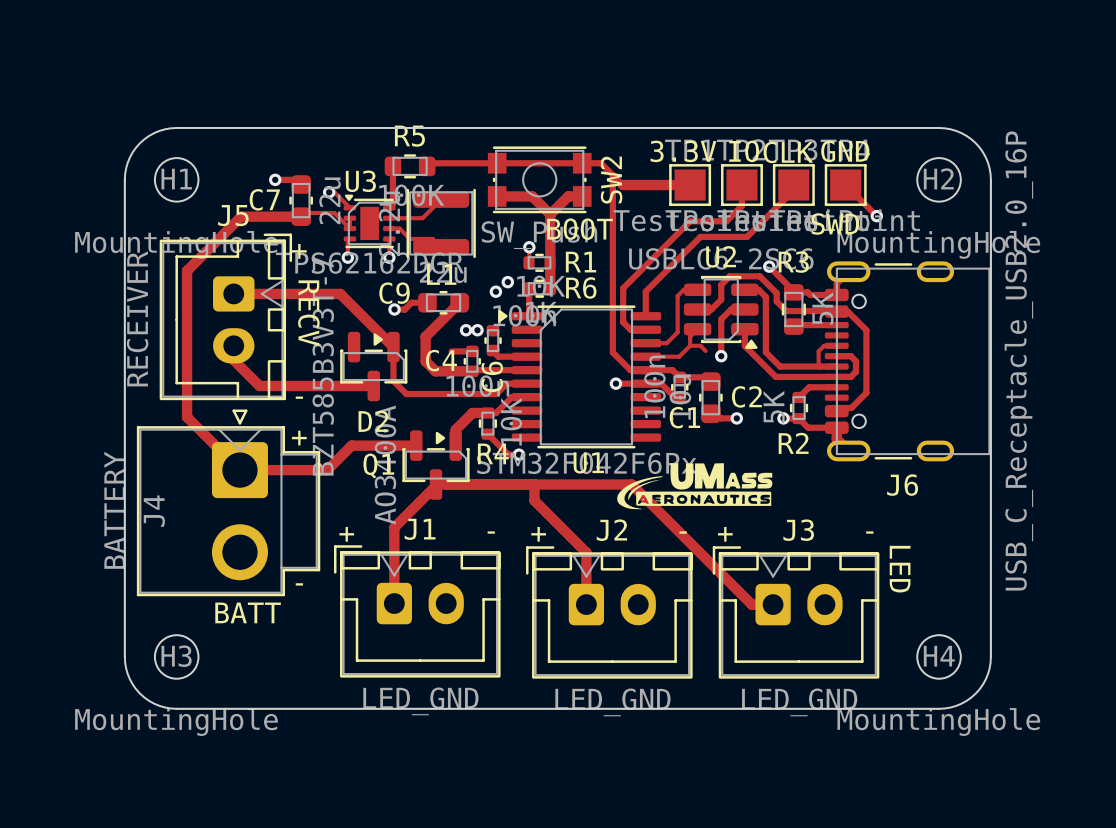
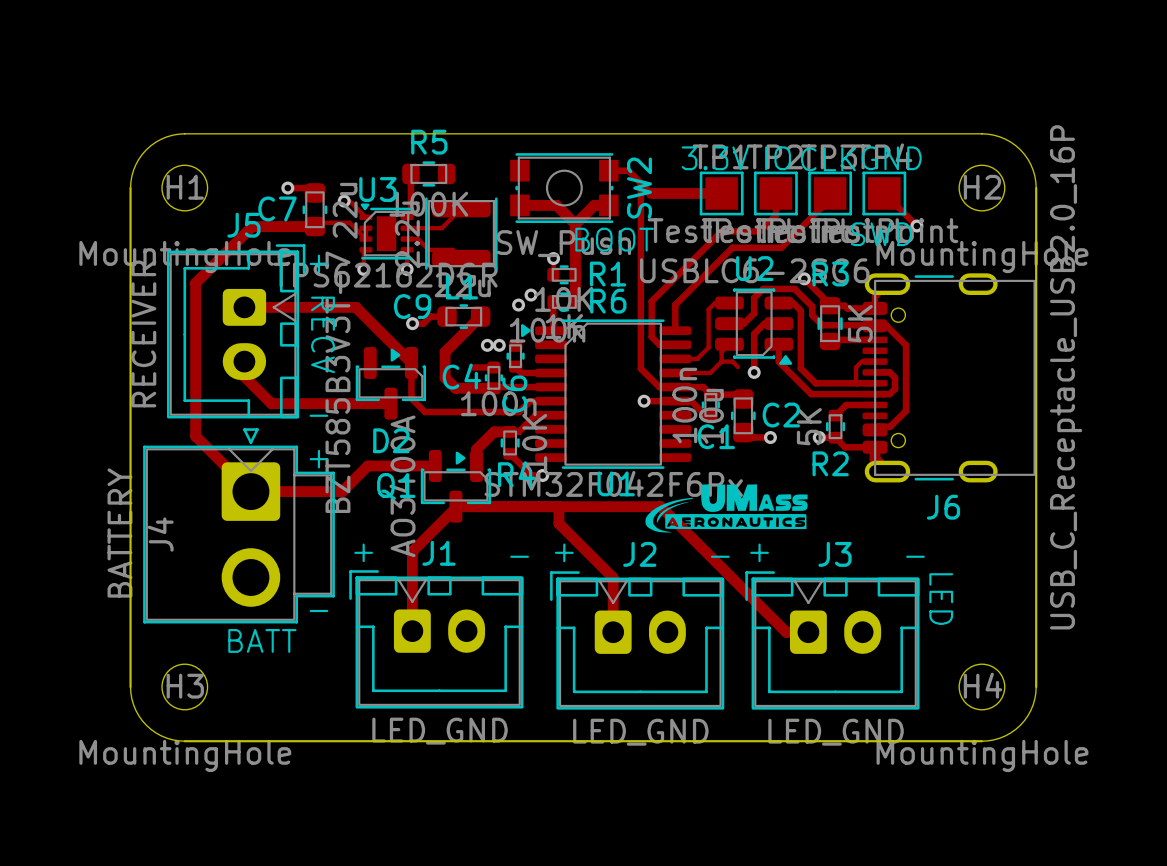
track: (582, 163) (430, 163) (427, 166) -> none

